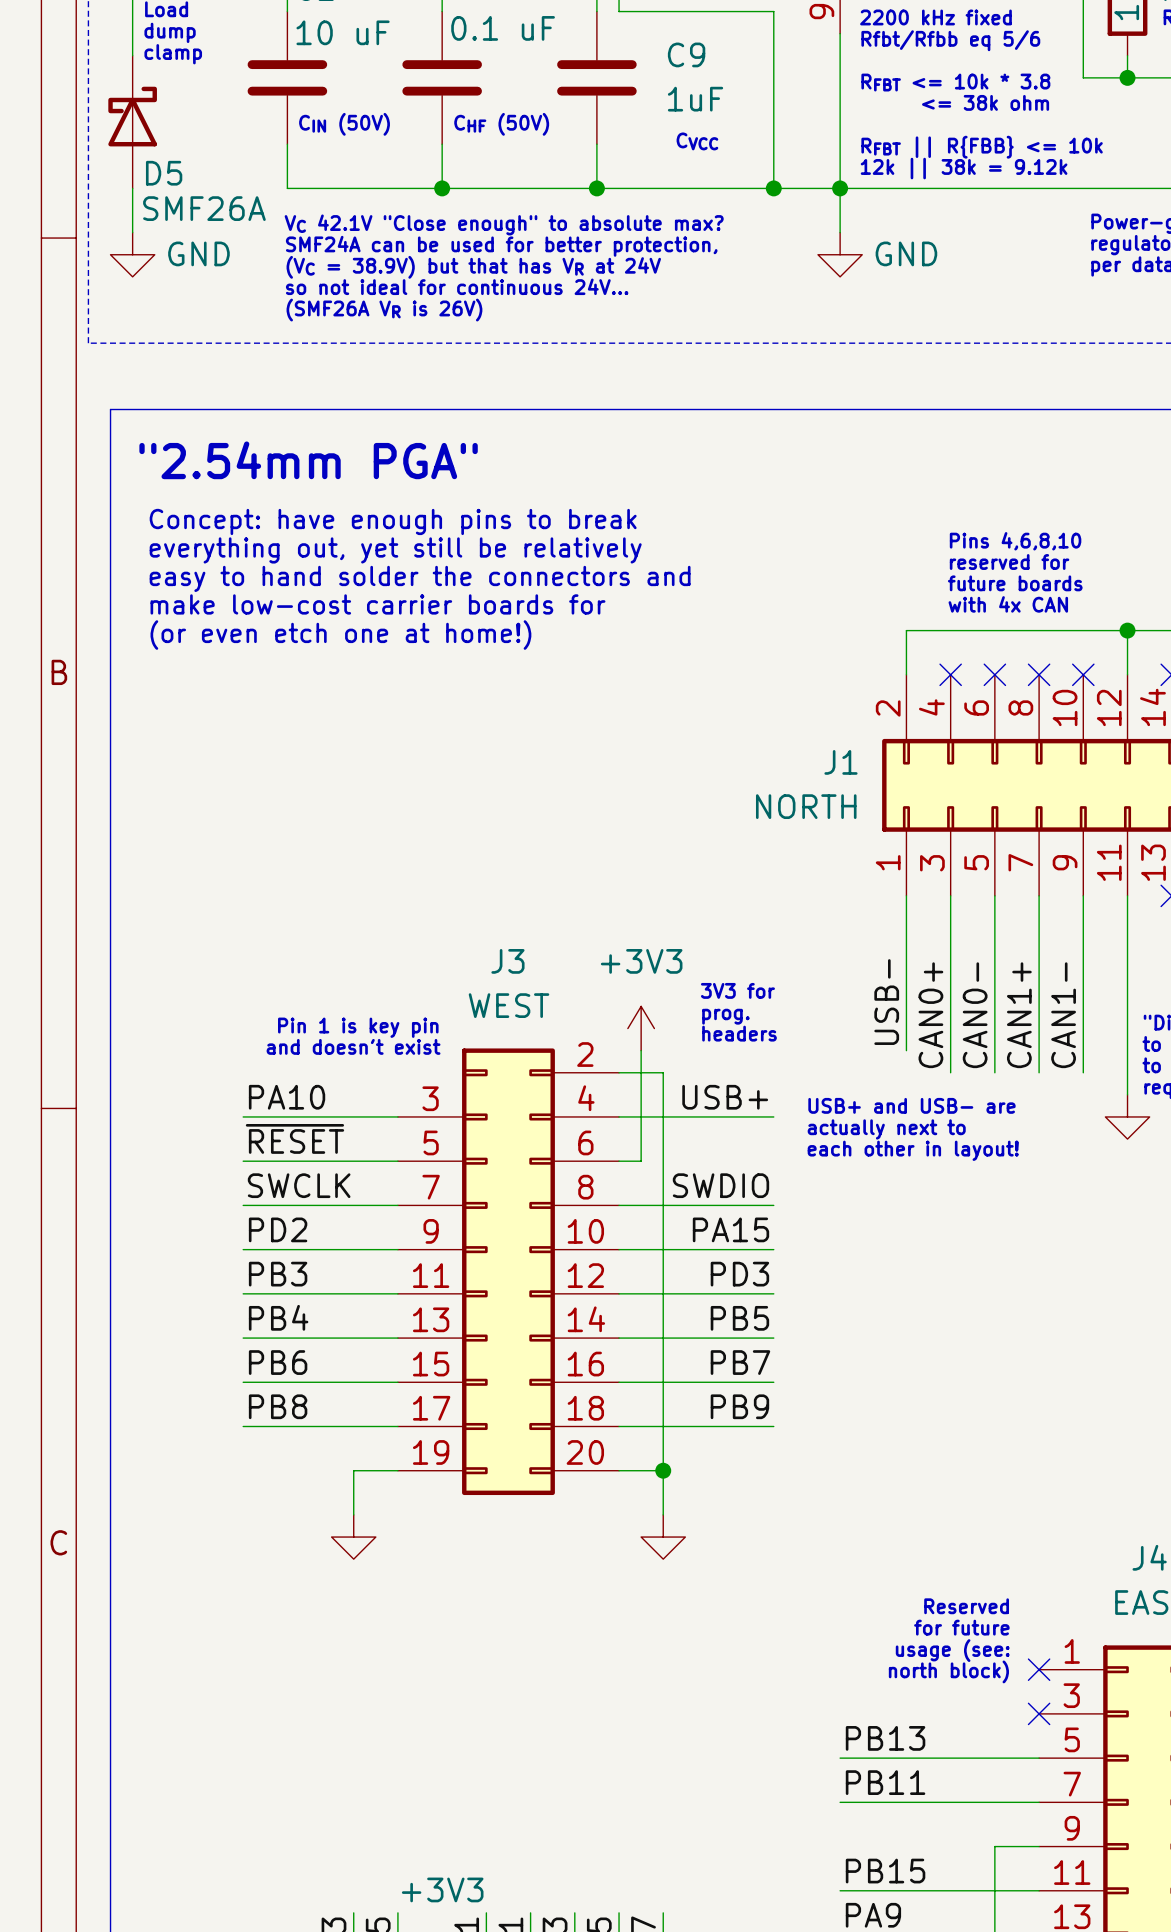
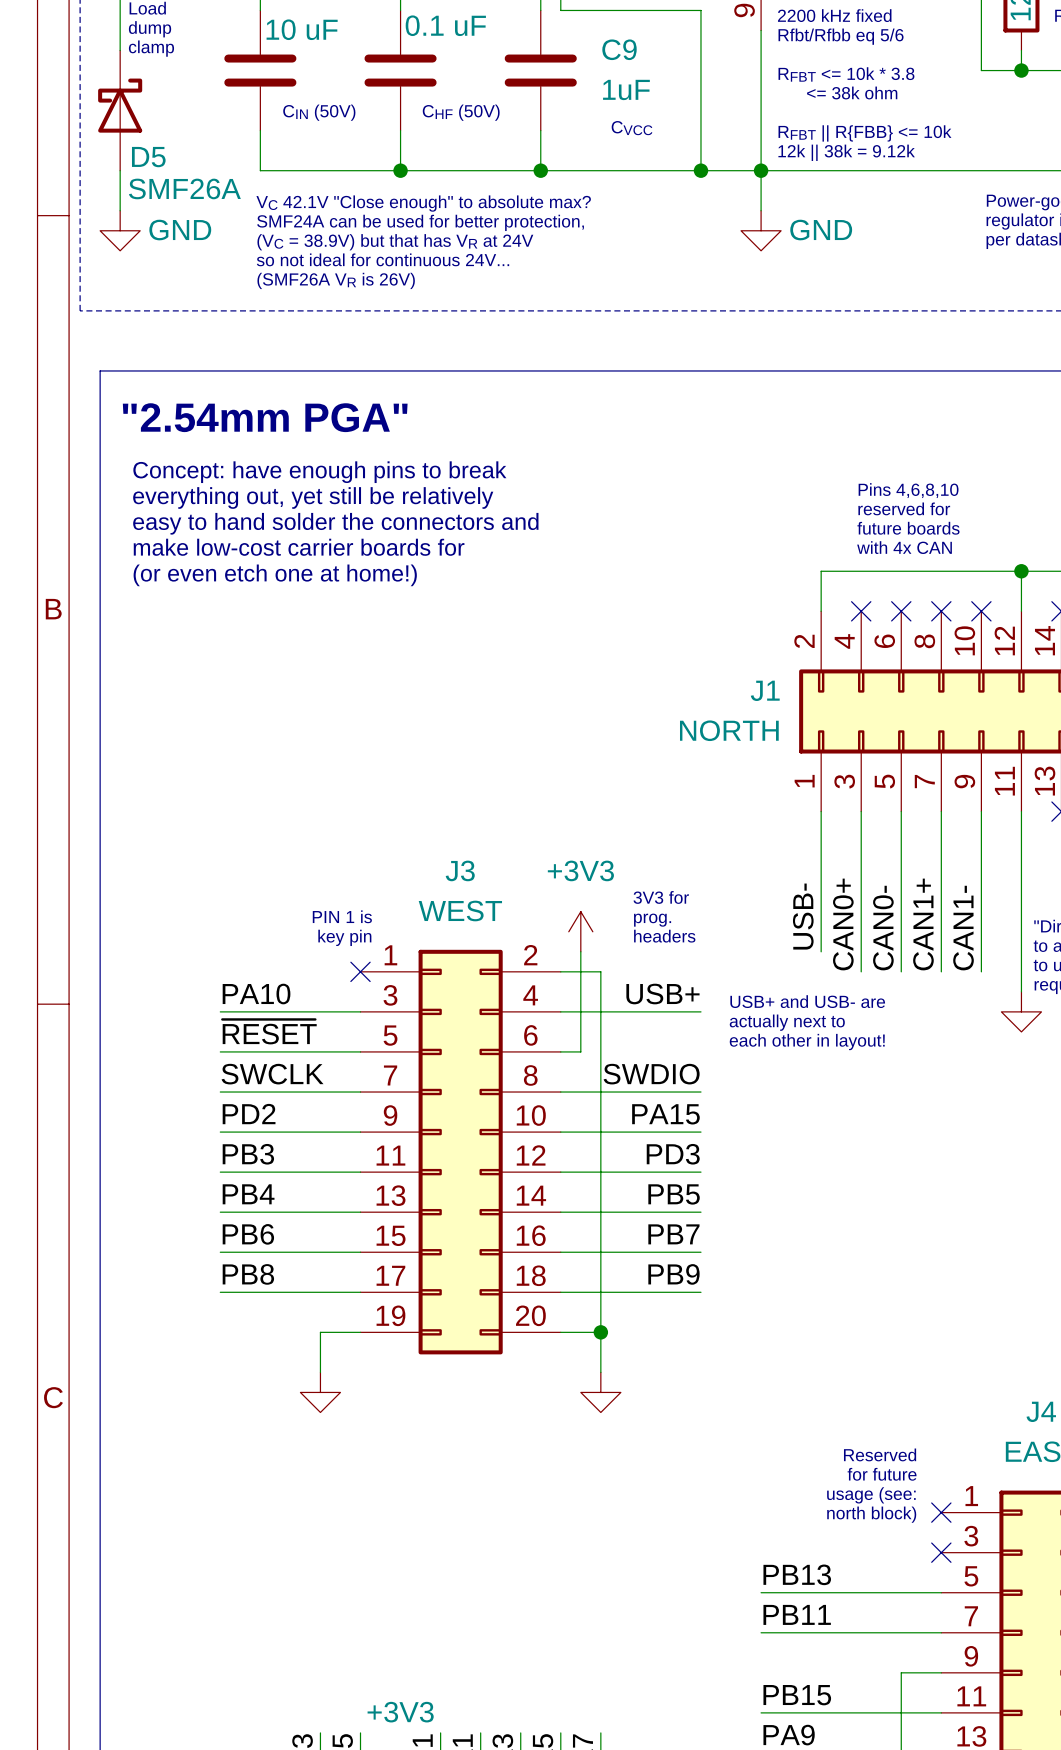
text: none -> PIN 1 is (342, 916)
text: Pin 1 is key pin (358, 1027) -> key pin (344, 937)
text: and doesn't exist (353, 1046) -> none
J3 symbol: [397, 1048, 620, 1496] -> [360, 949, 561, 1355]
no-connect mark: none -> (360, 971)

